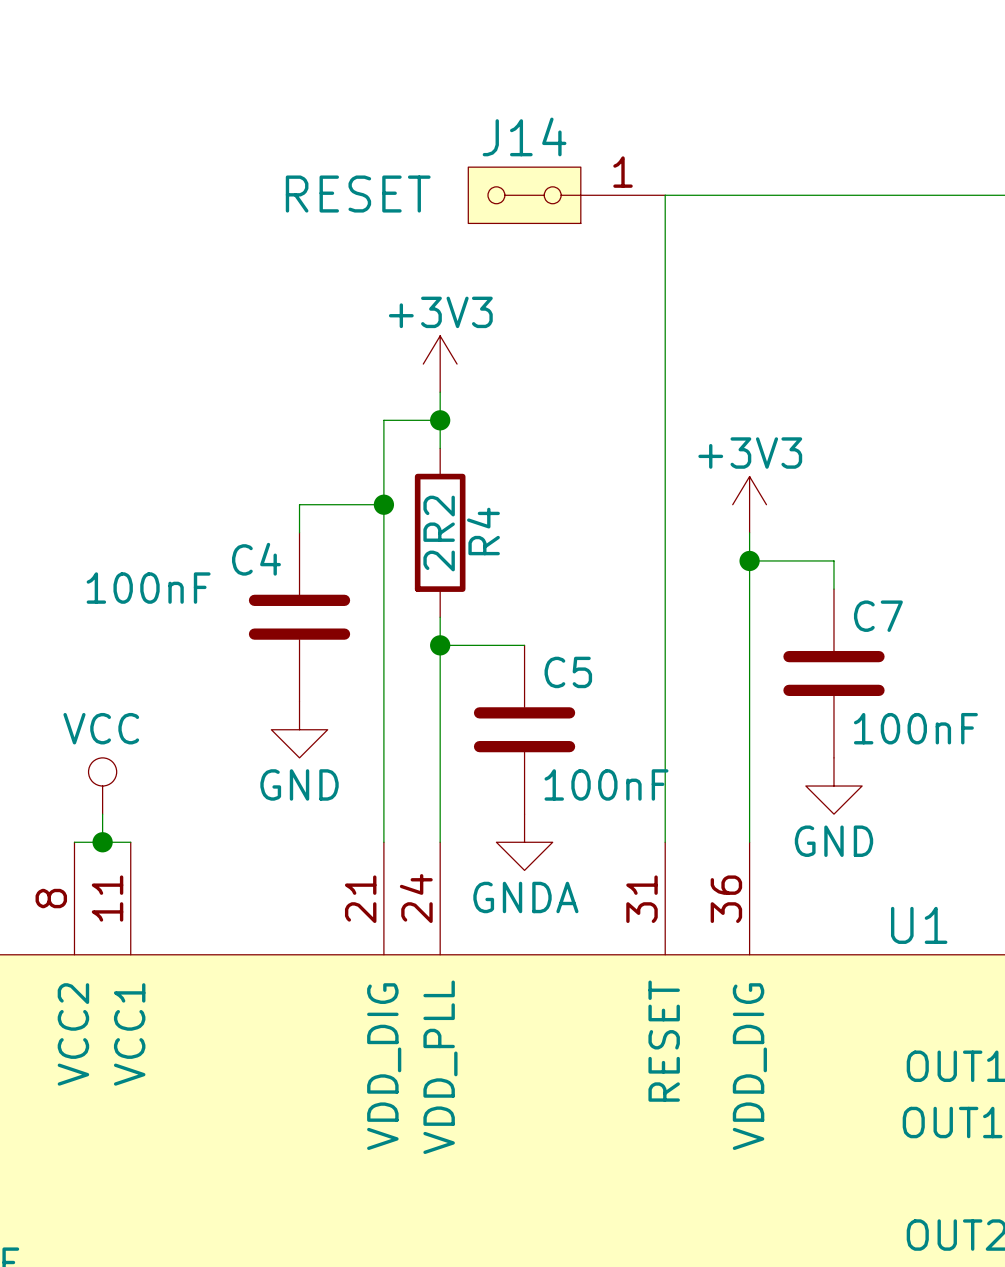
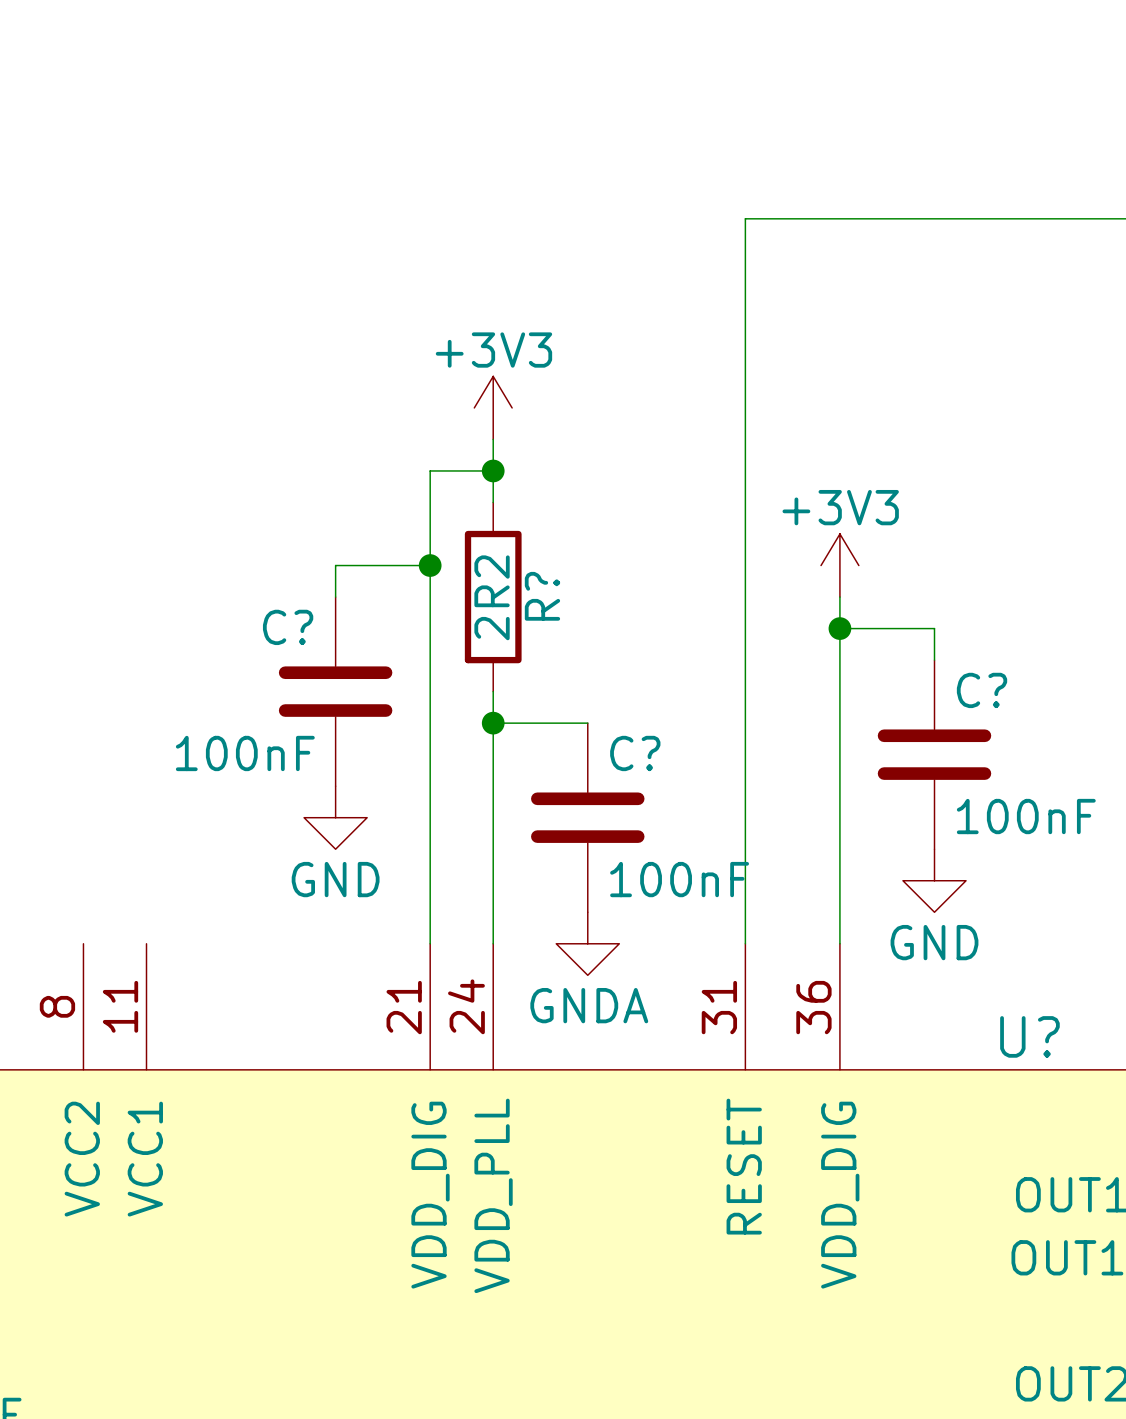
J14: RESET (566, 195) -> none
R4 name: R4 (483, 531) -> R? (542, 596)
C4 name: C4 (256, 559) -> C? (288, 627)
C4 value position: 100nF (148, 588) -> 100nF (245, 753)
C7 name: C7 (878, 616) -> C? (982, 690)
C5 name: C5 (568, 672) -> C? (635, 753)
power symbol: VCC (102, 786) -> none
wire: (102, 814) (102, 842) -> none
wire: (74, 842) (130, 842) -> none
junction: (102, 842) -> none
U1 name: U1 (919, 925) -> U? (1029, 1036)

